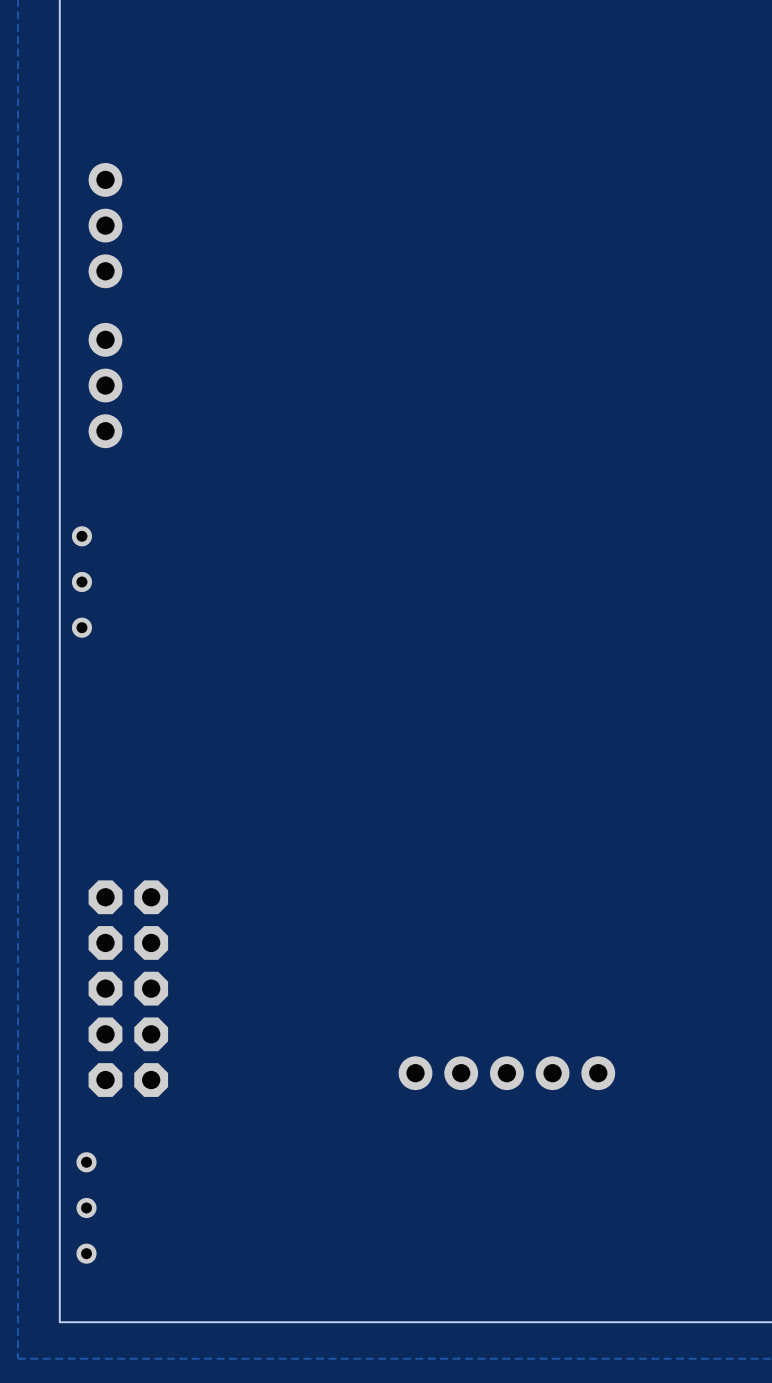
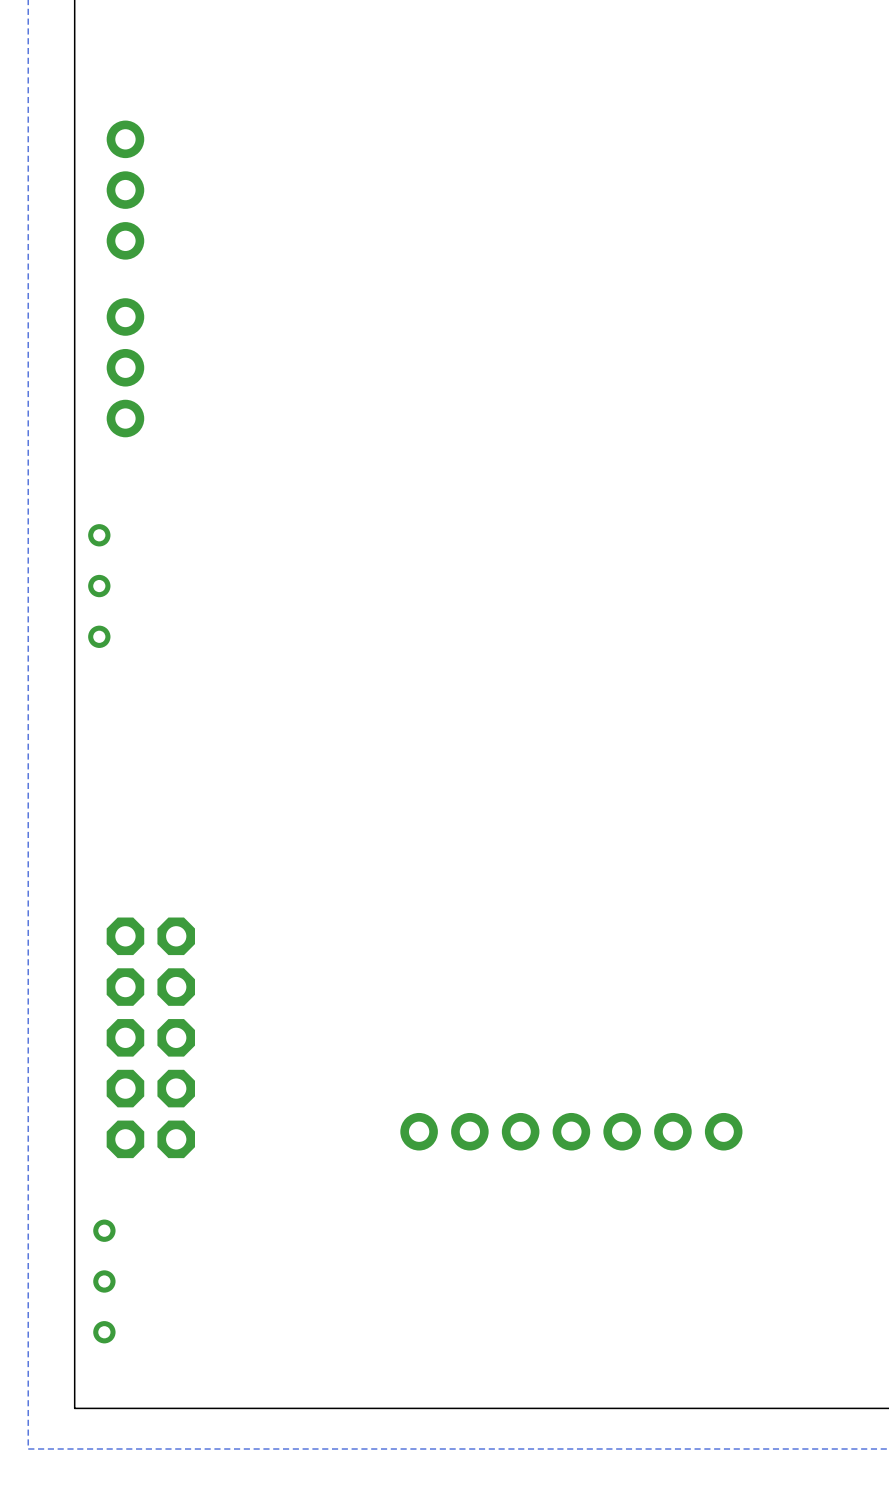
part footprint: [398, 1056, 616, 1091] -> [400, 1112, 743, 1151]

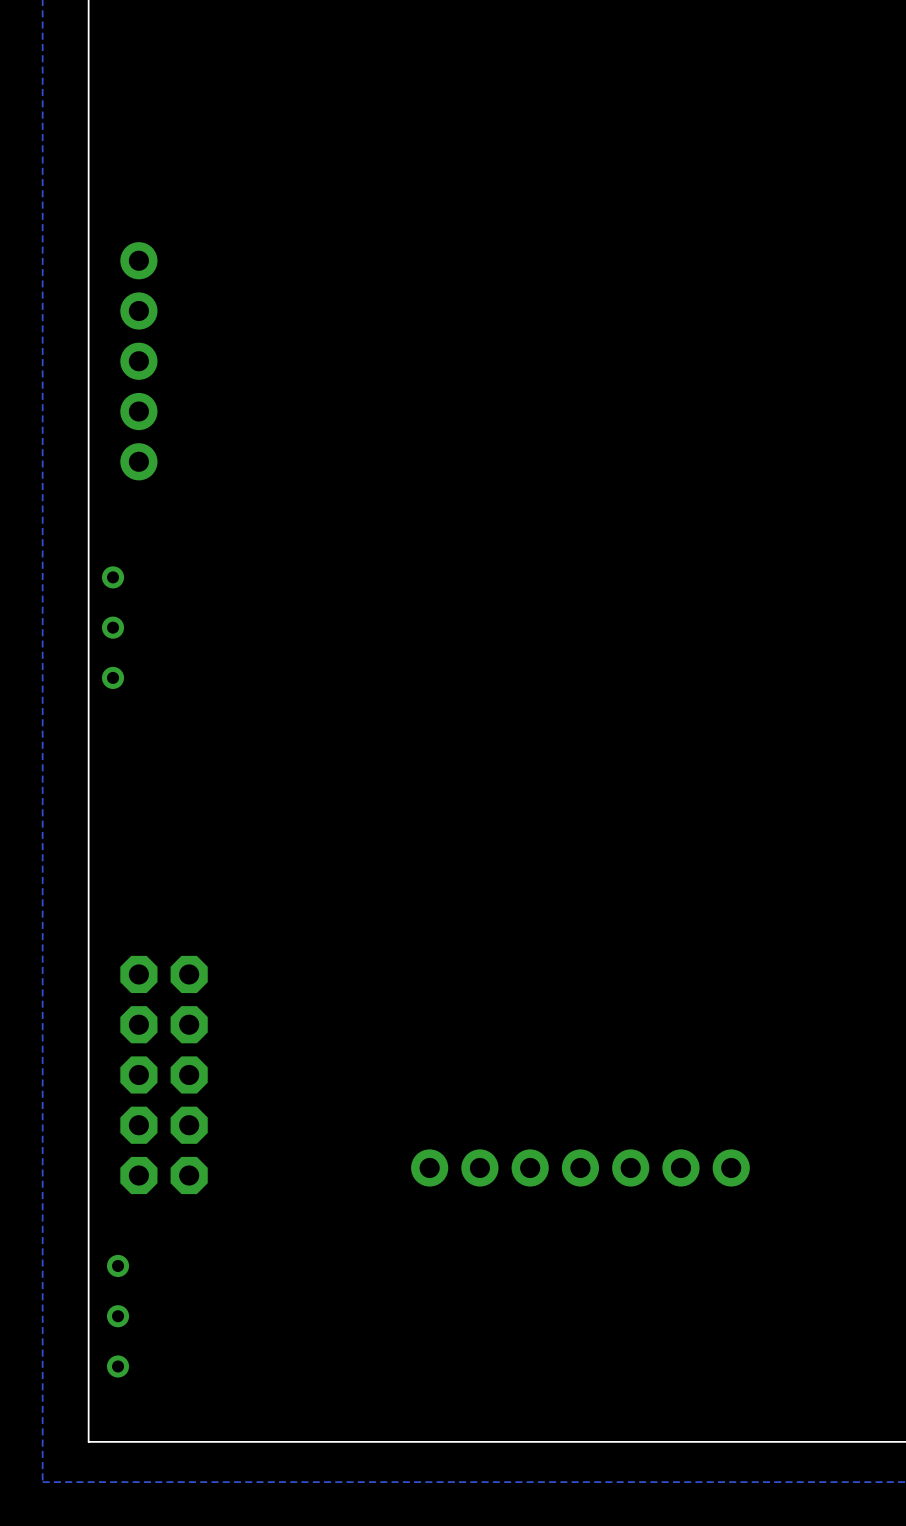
part: (125, 190) -> none
part: none -> (138, 361)

